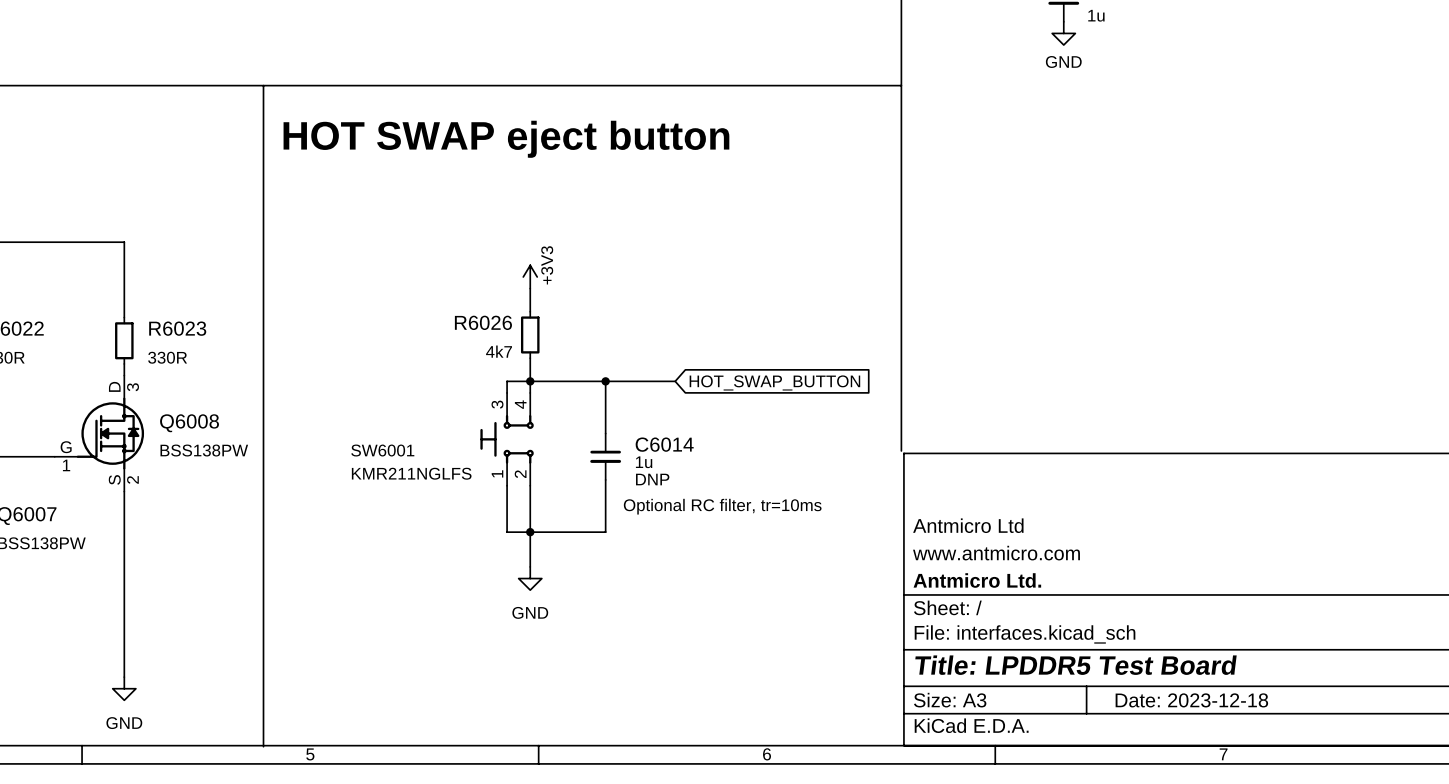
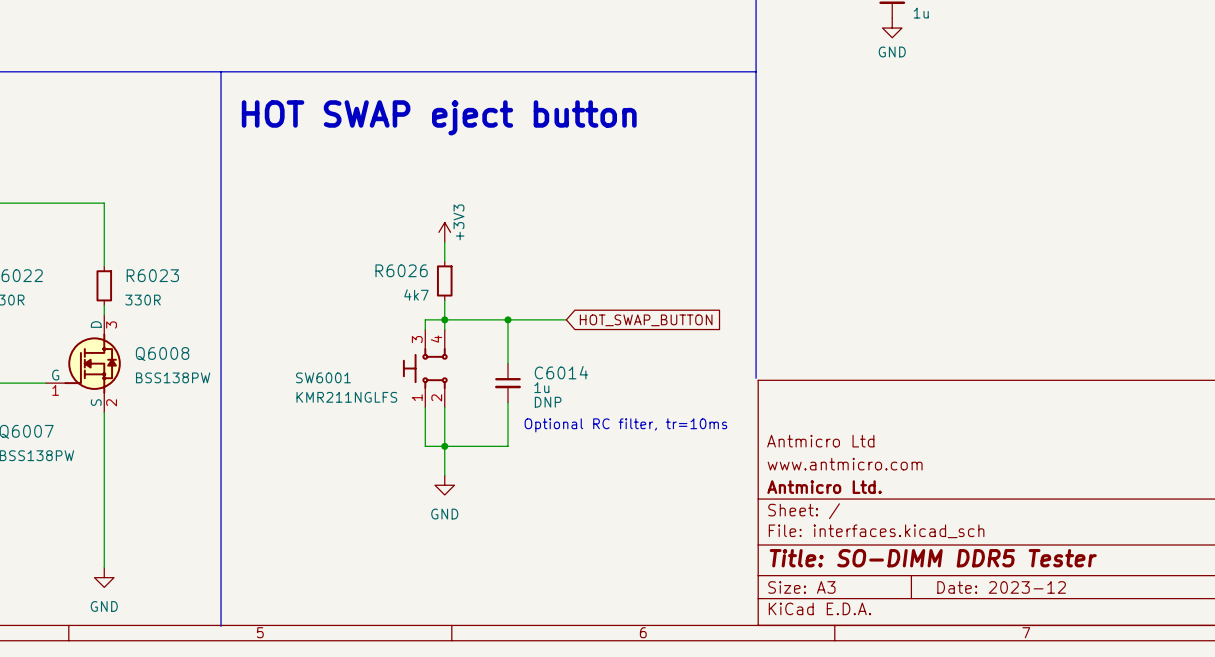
title block: Title: LPDDR5 Test Board (1075, 665) -> Title: SO-DIMM DDR5 Tester (933, 558)
title block: Date: 2023-12-18 (1191, 700) -> Date: 2023-12 (1001, 587)

